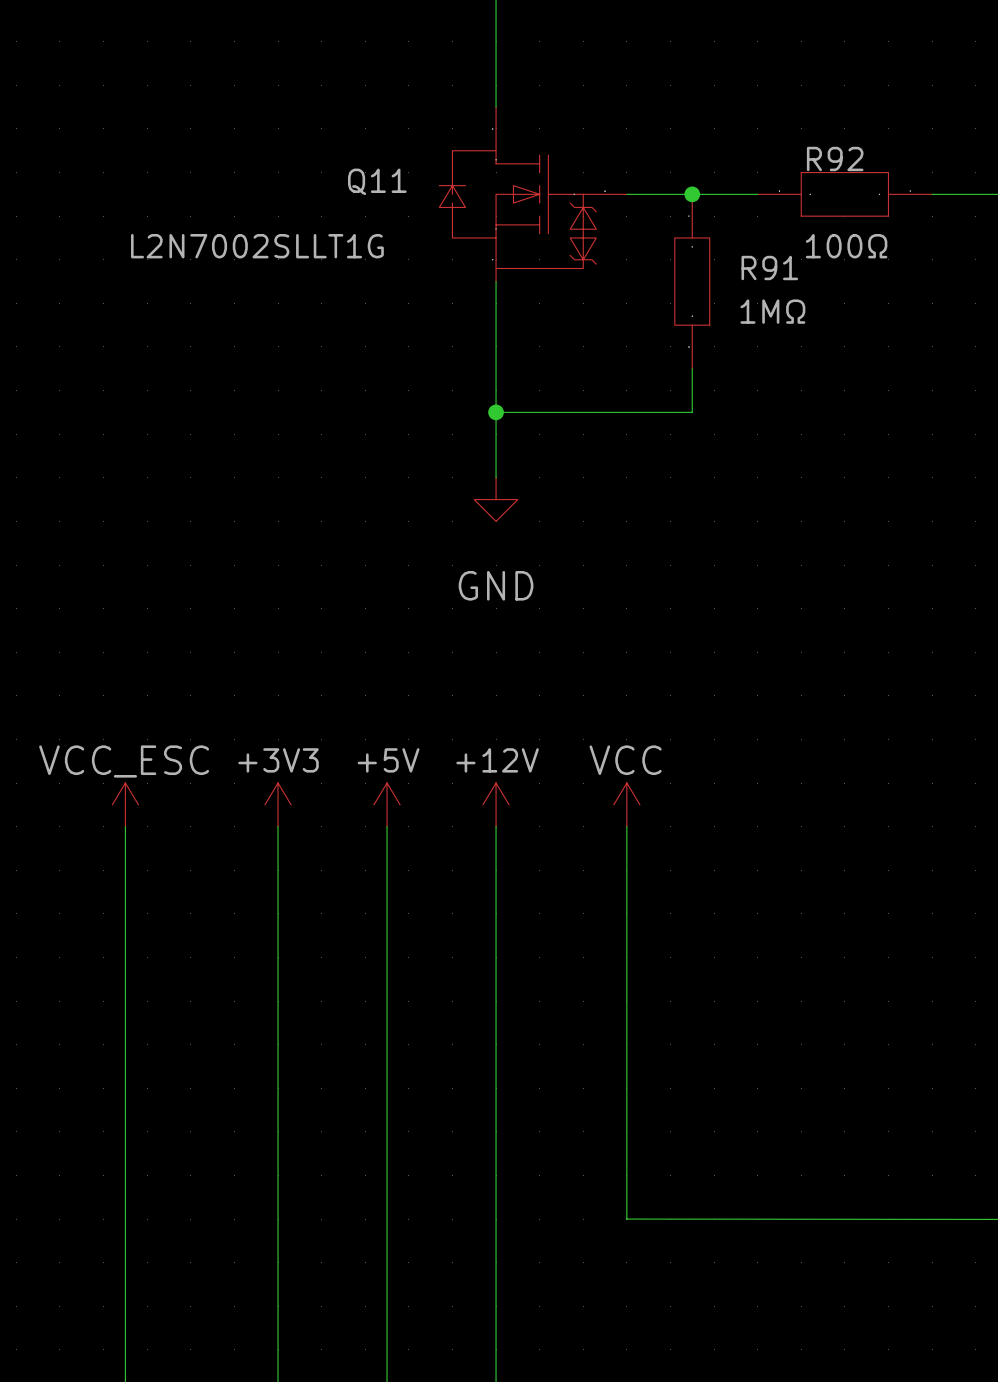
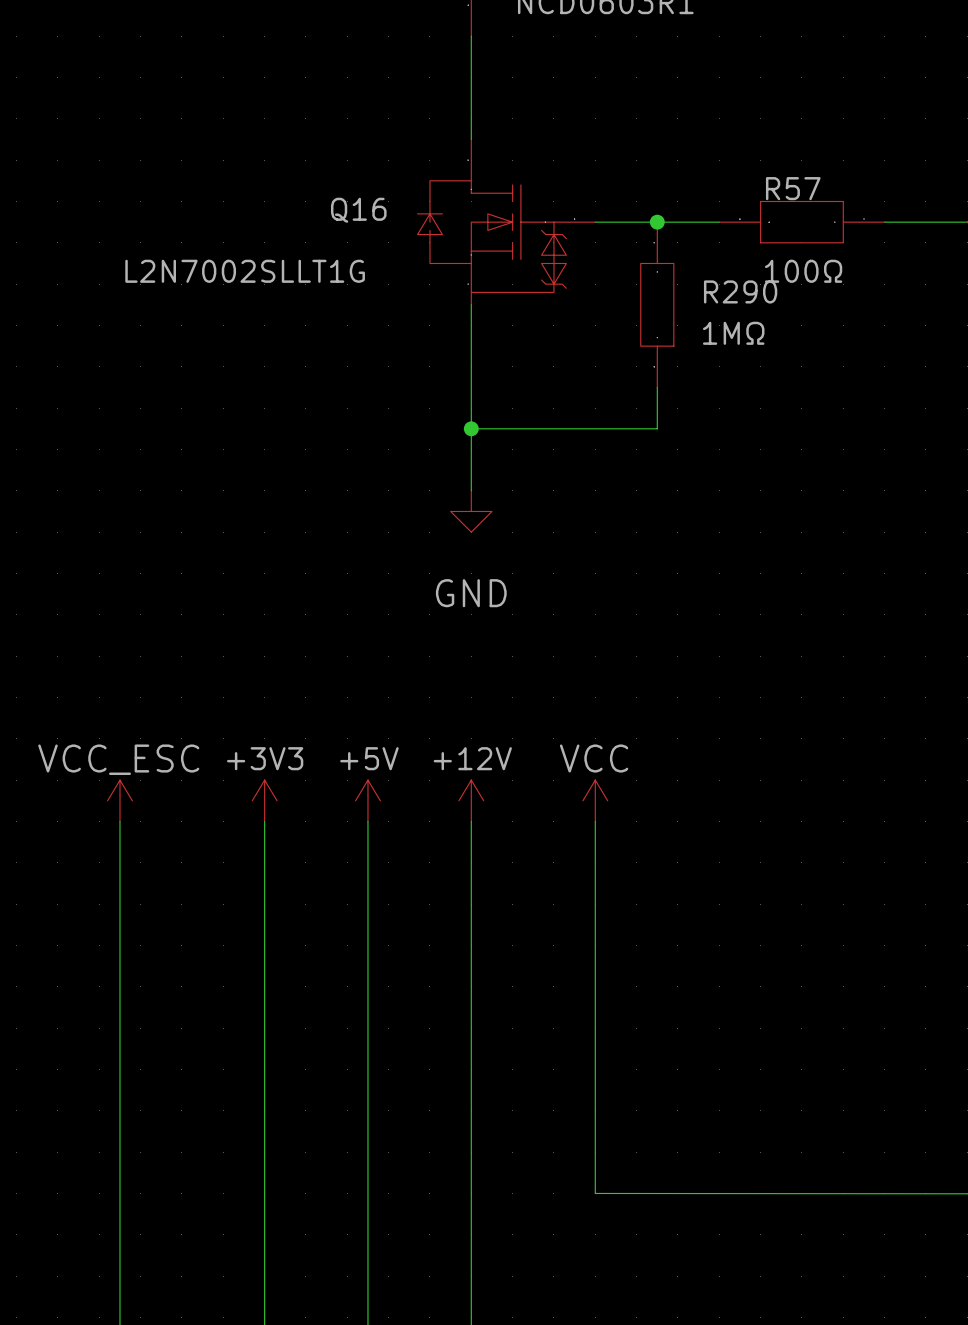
R92 name: R92 (835, 158) -> R57 (793, 188)
Q11 name: Q11 (377, 181) -> Q16 (358, 210)
R91 name: R91 (769, 268) -> R290 (740, 291)

